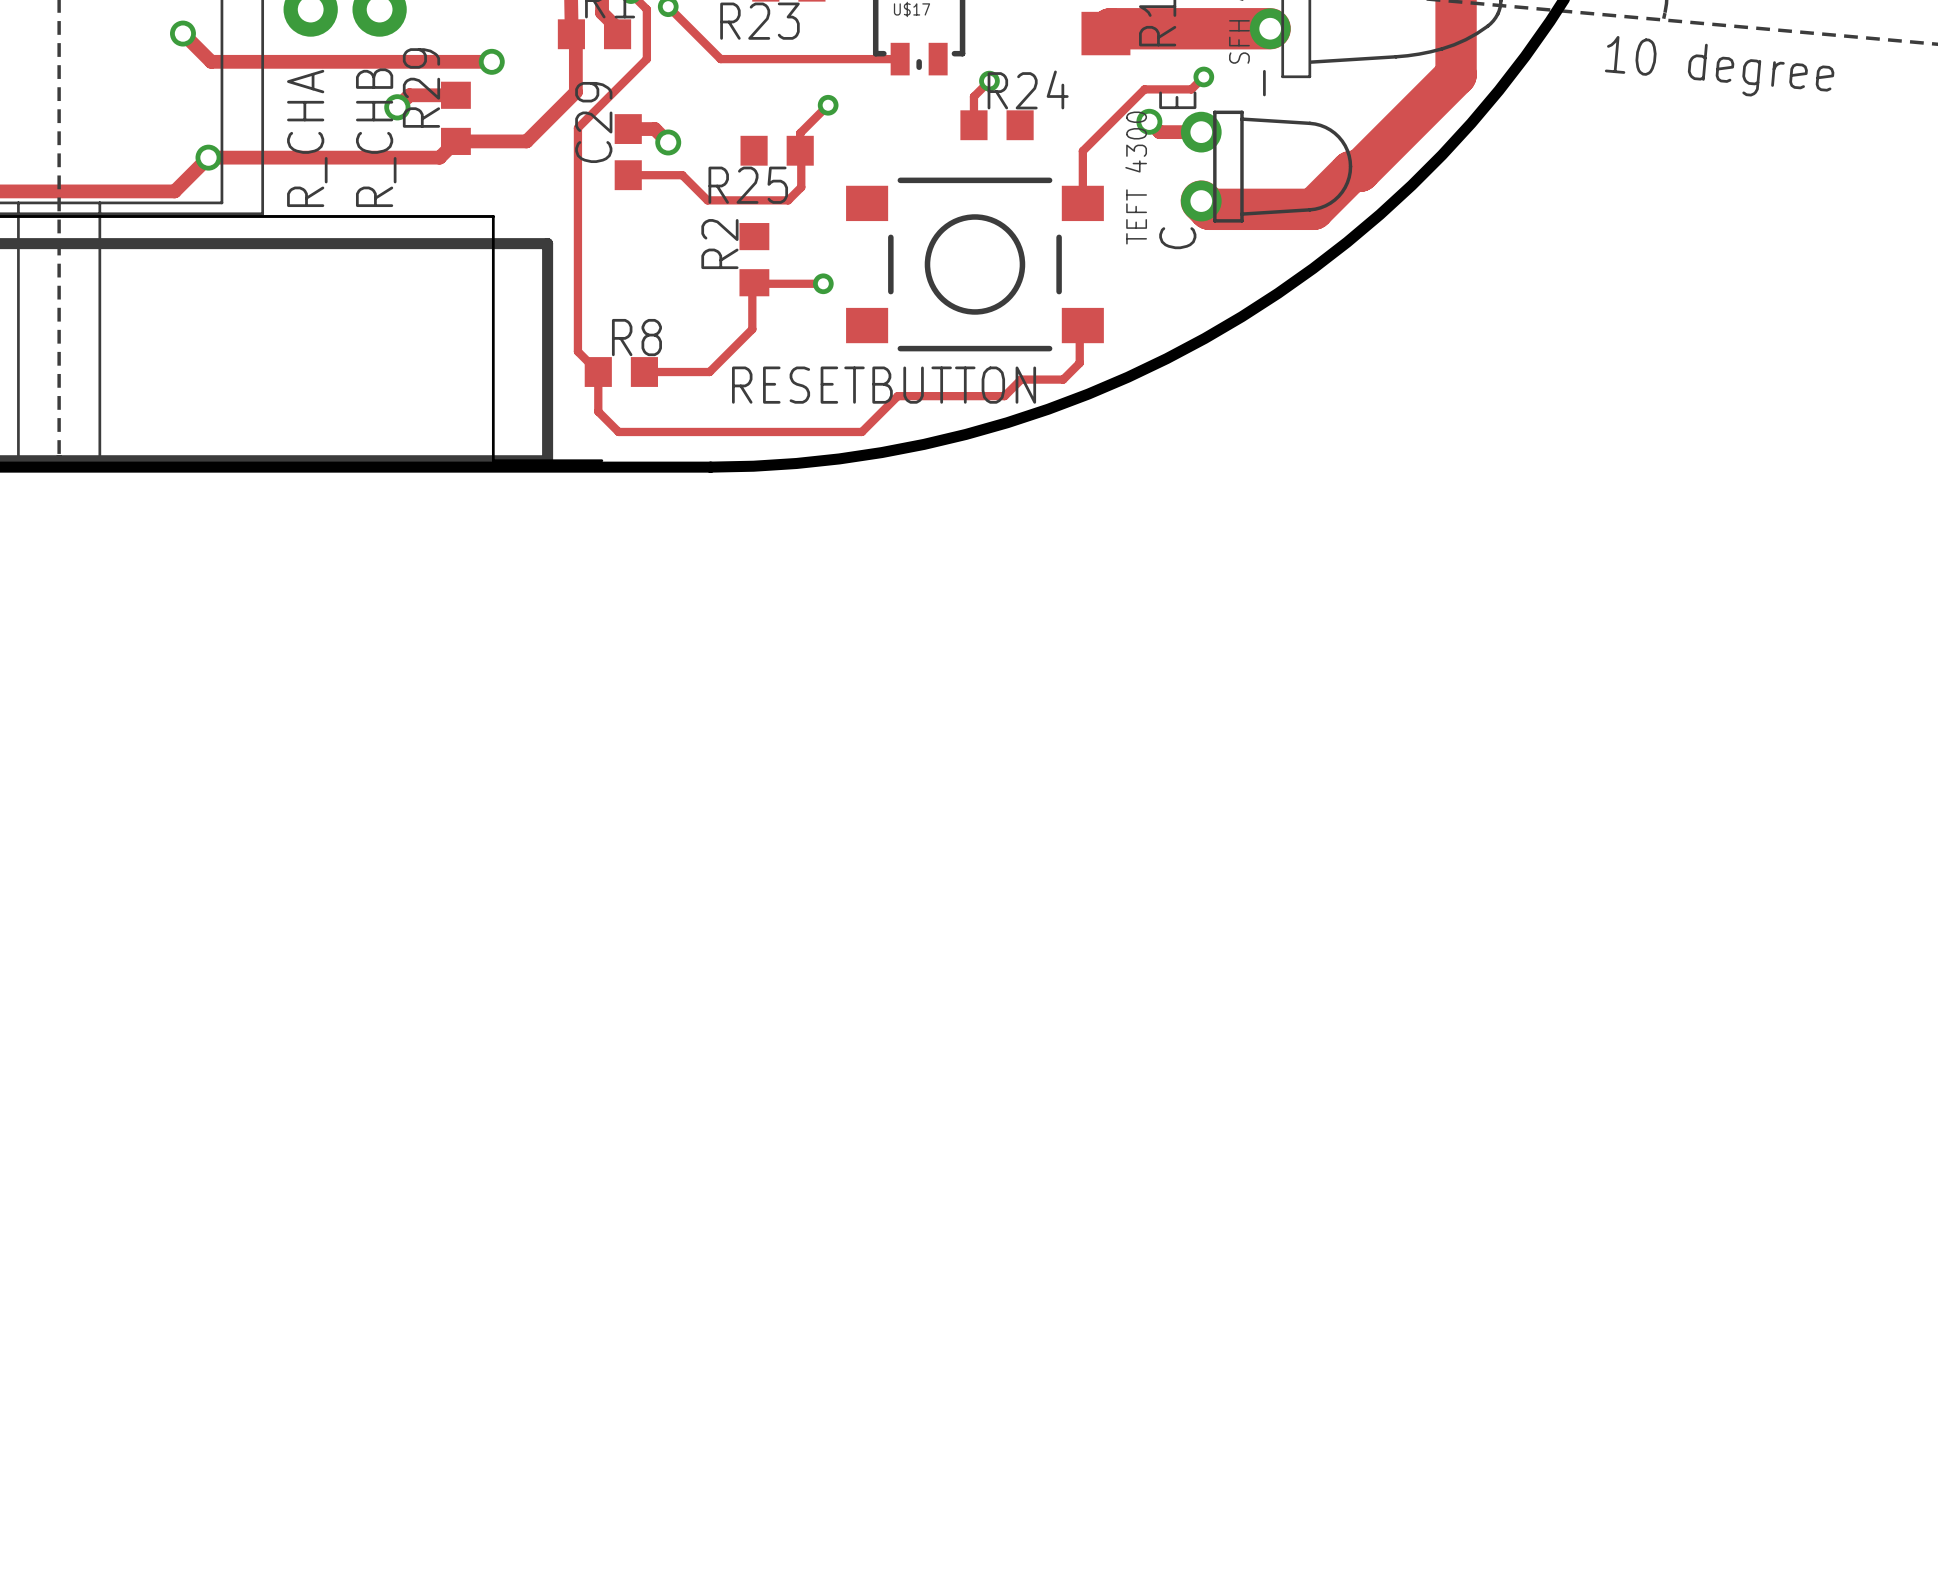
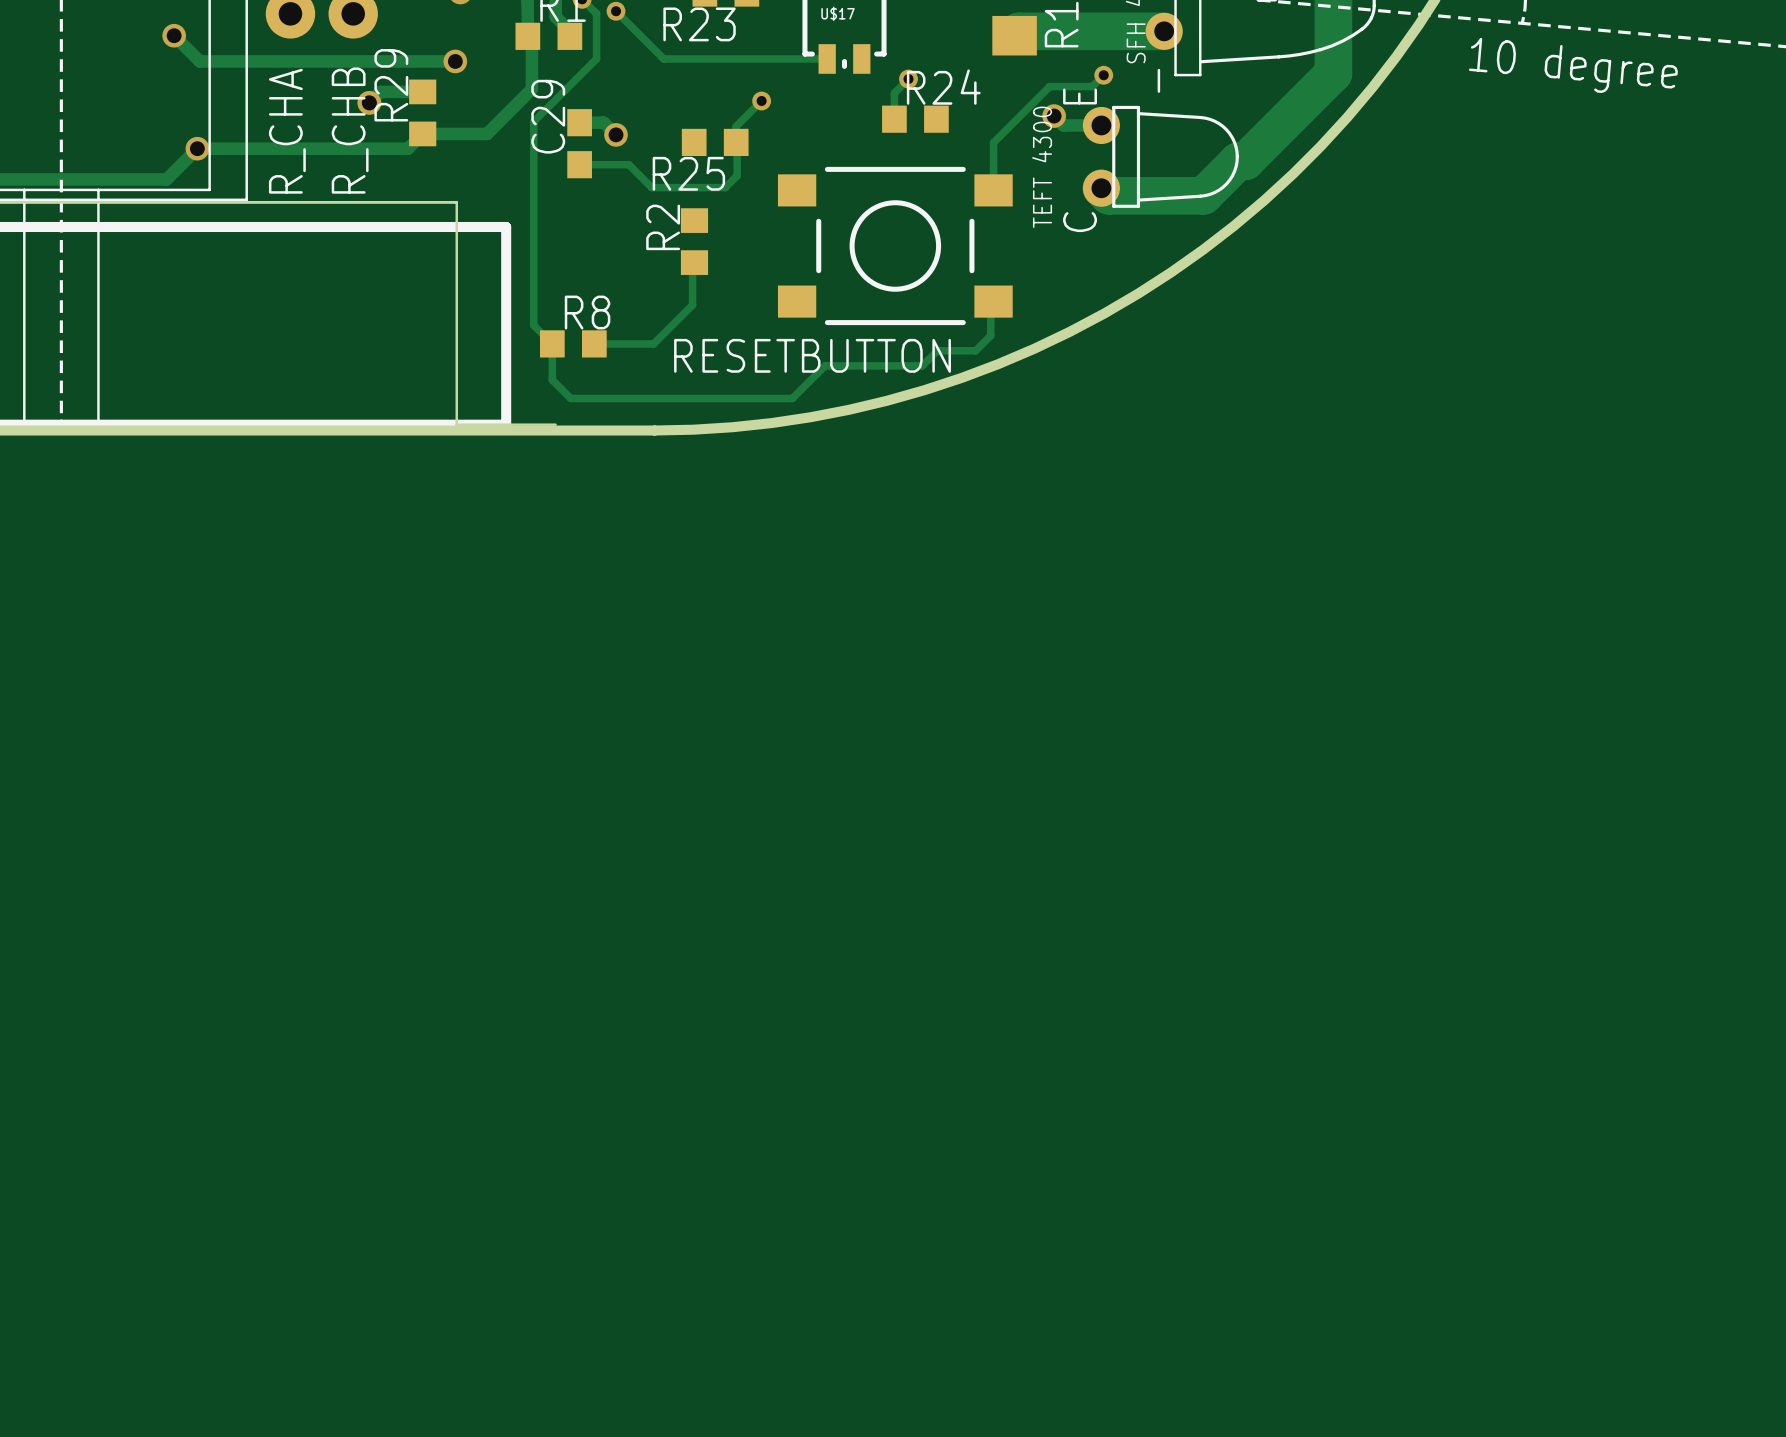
track: (754, 282) (823, 283) -> none
via: (823, 283) -> none

